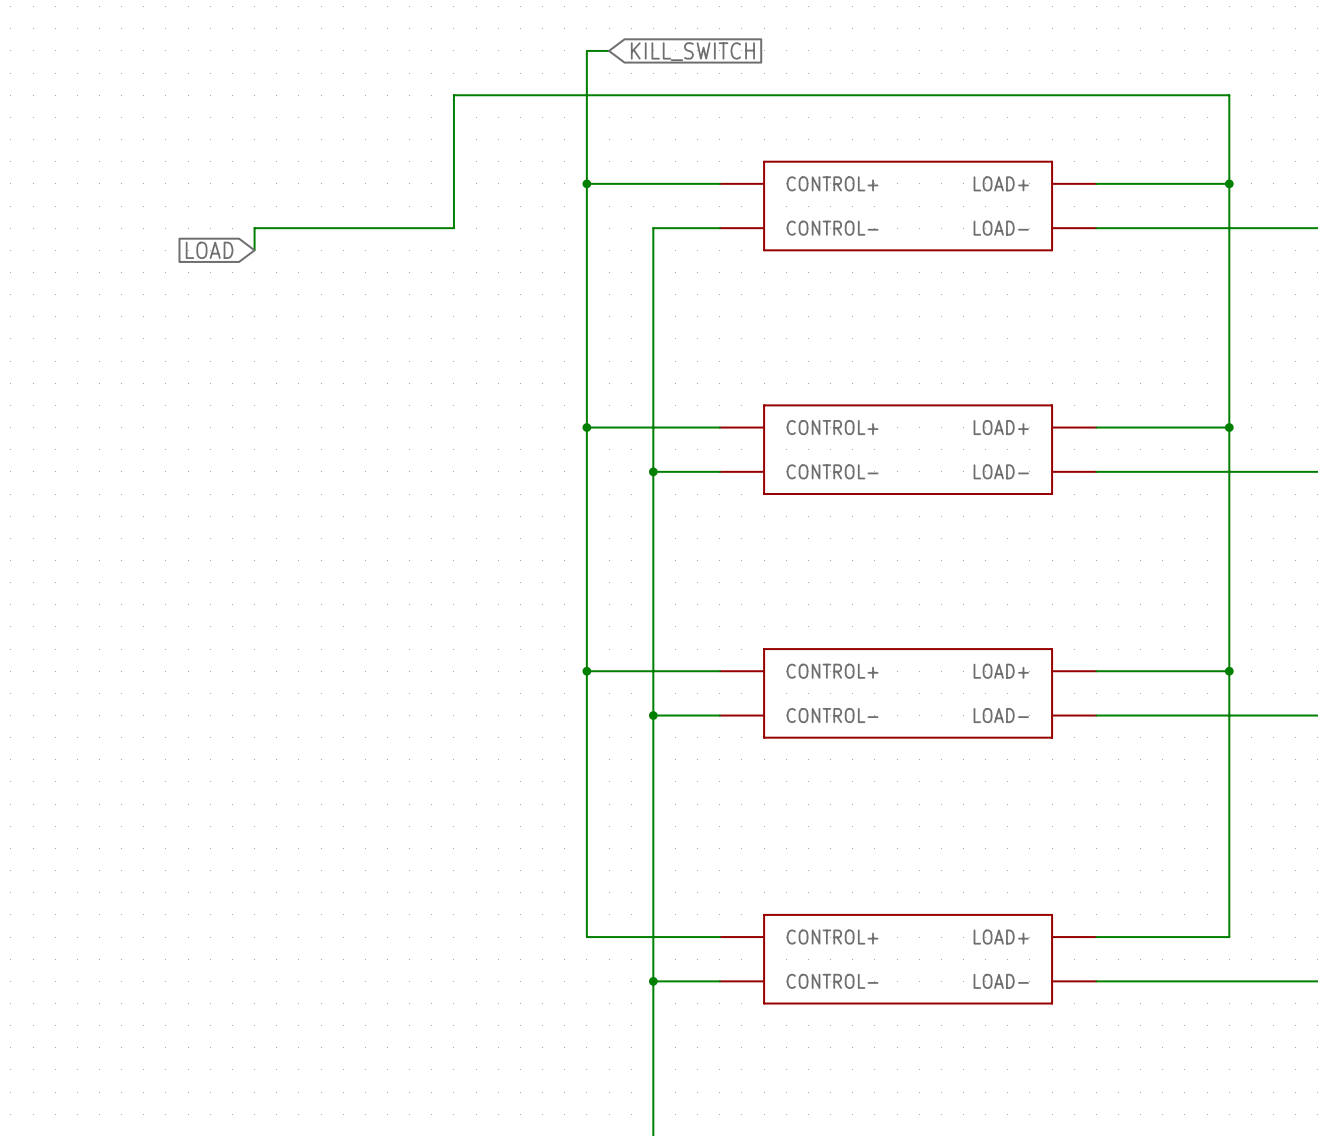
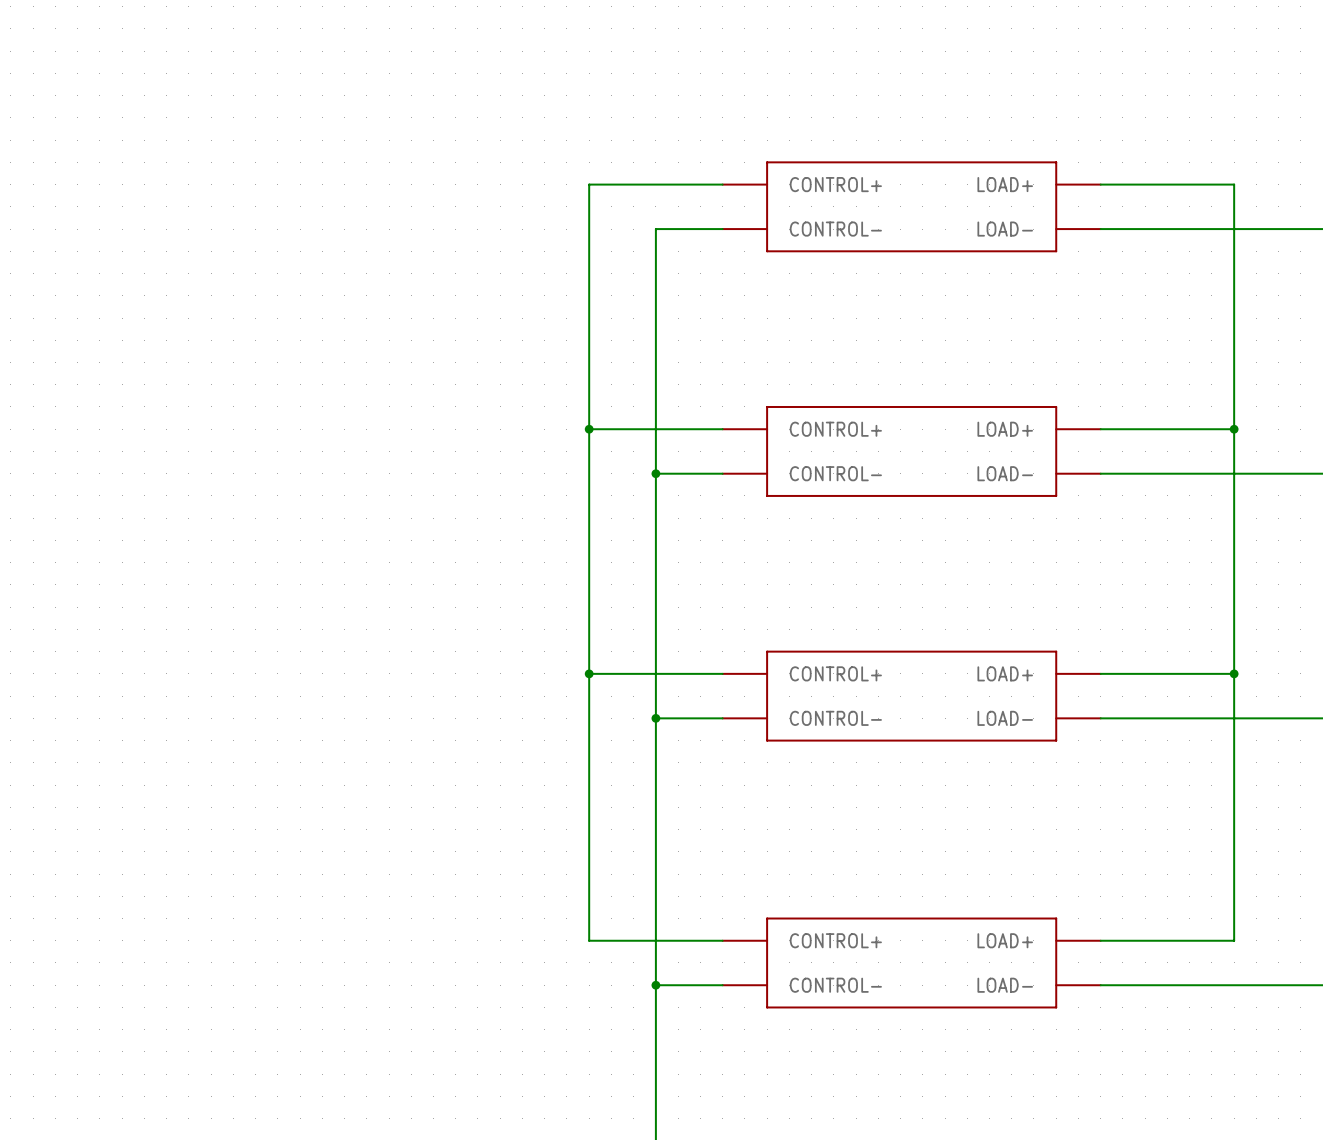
wire: (609, 50) (586, 50) (586, 183) -> none
global label: KILL_SWITCH (692, 51) -> none
junction: (586, 183) -> none
wire: (1229, 183) (1229, 95) (453, 95) (453, 228) (254, 228) (254, 250) -> none
junction: (1229, 183) -> none
global label: LOAD (209, 250) -> none

